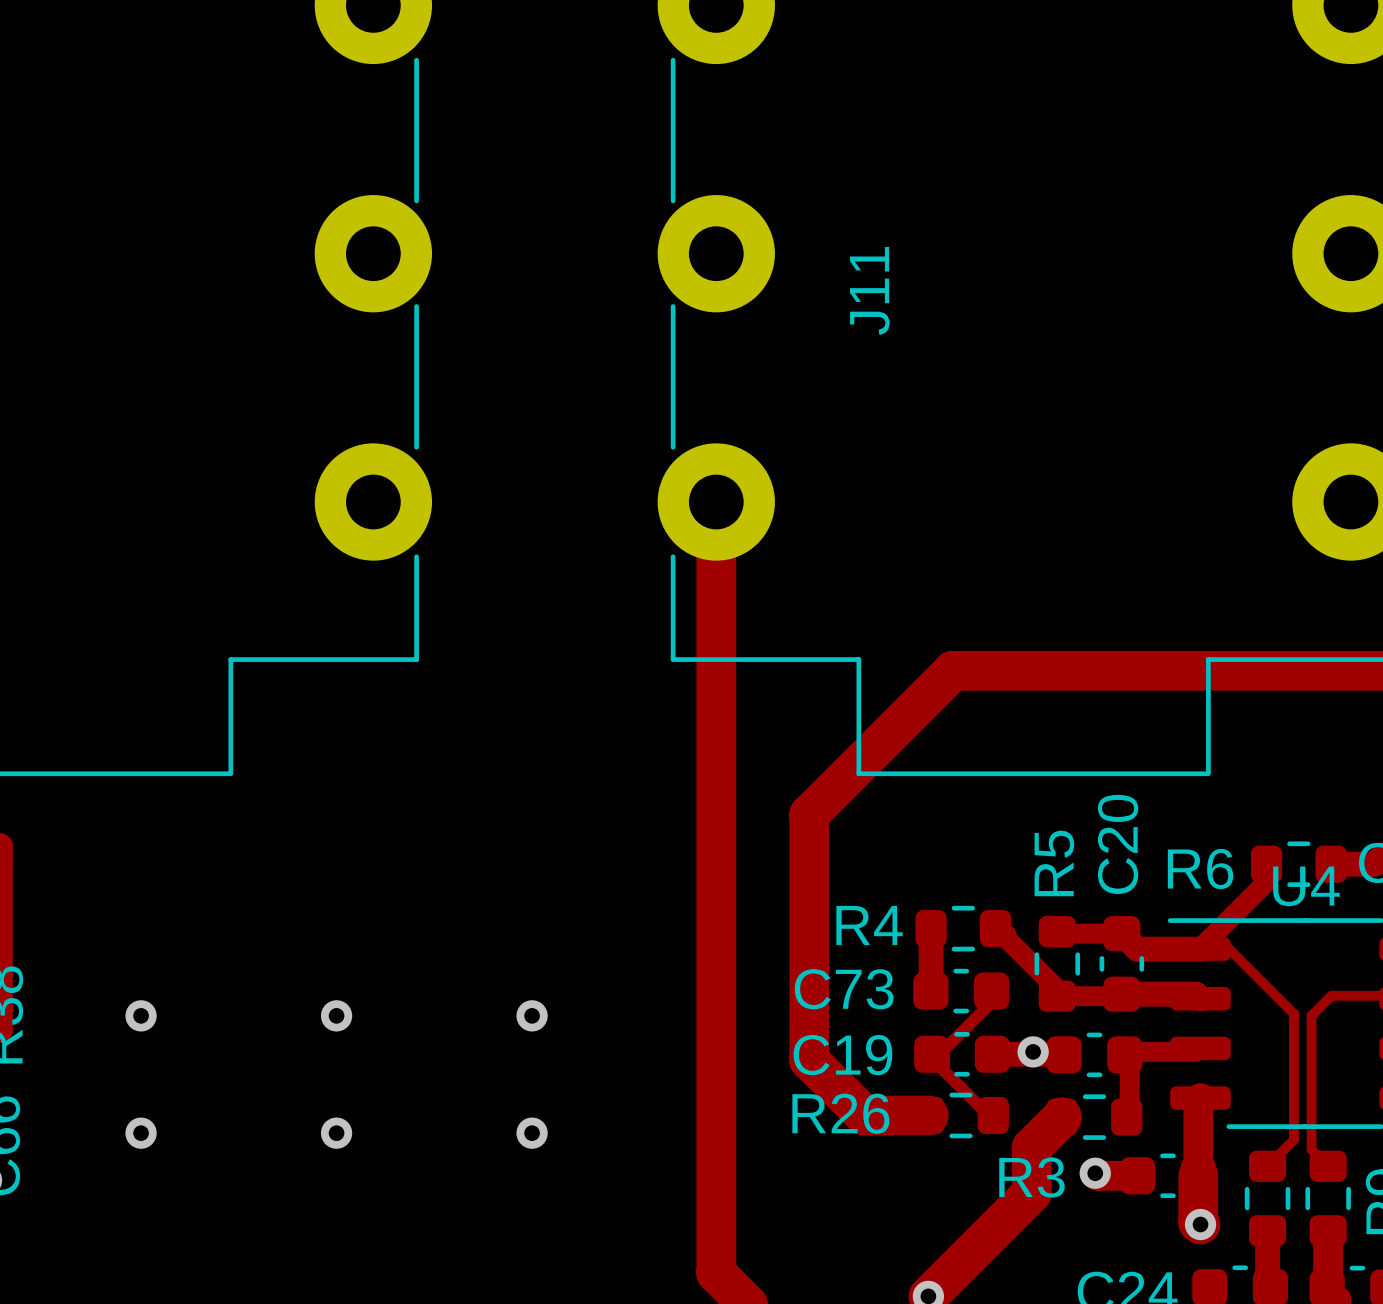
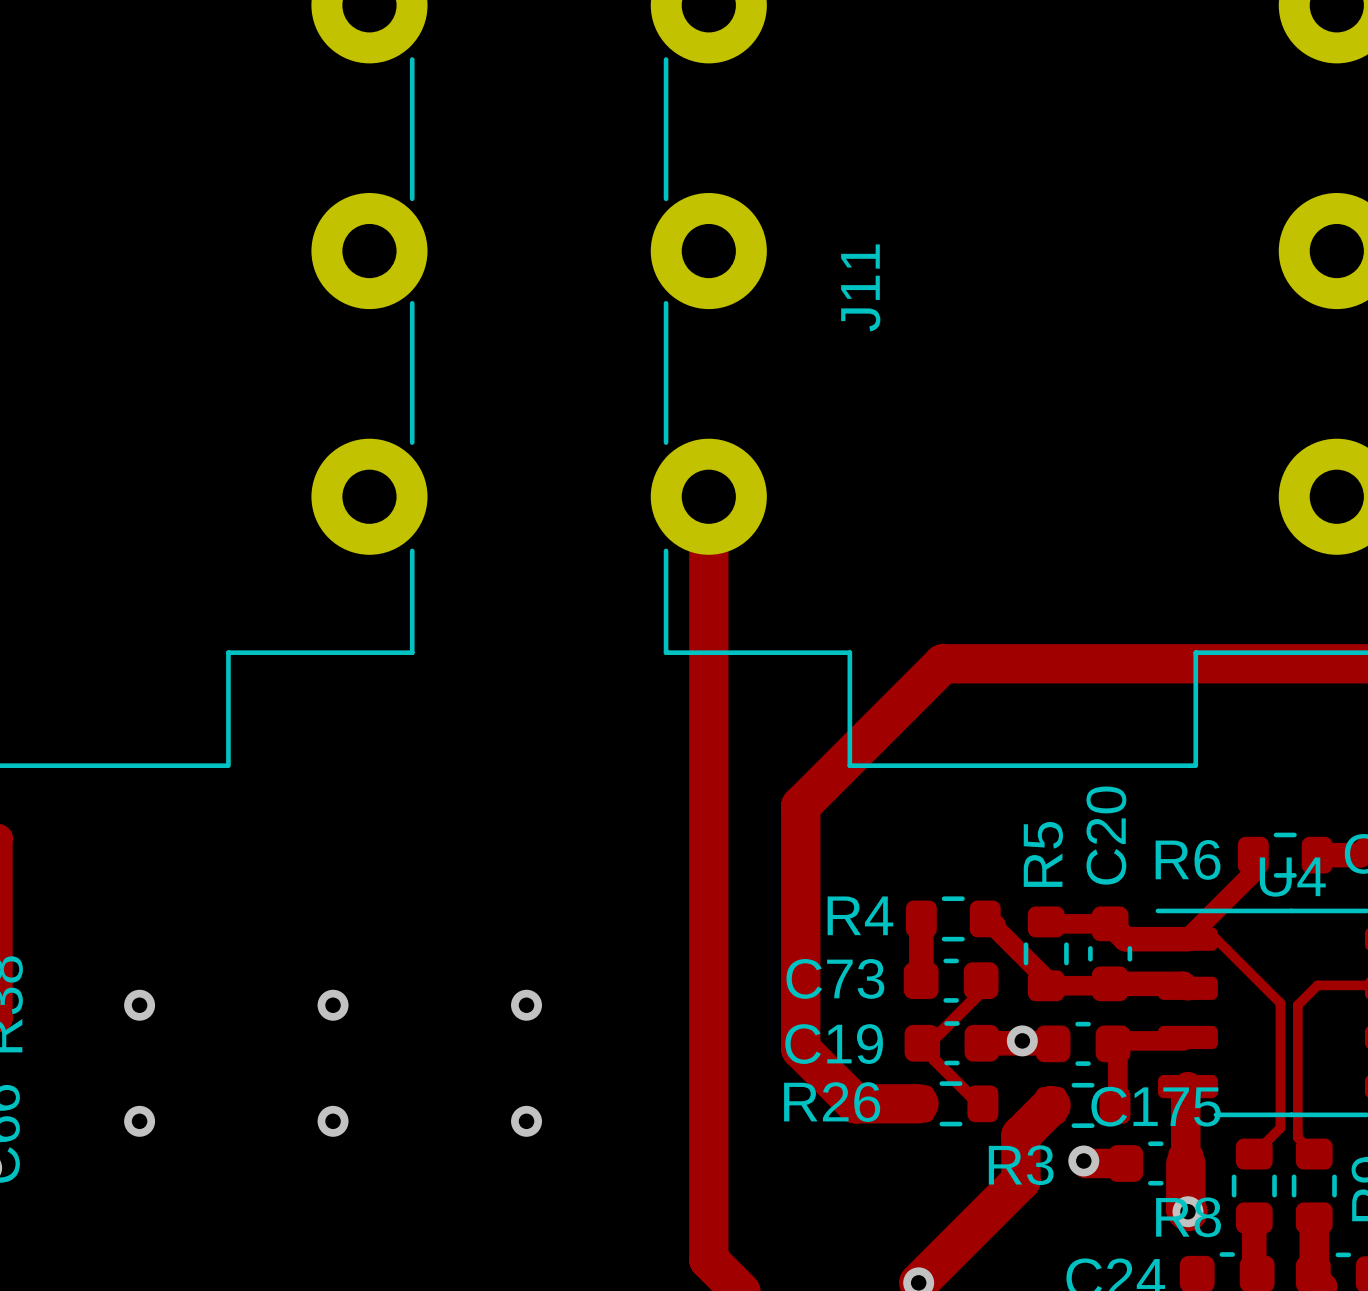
C175 name: none -> C175 (1156, 1106)
R8 name: none -> R8 (1188, 1217)

